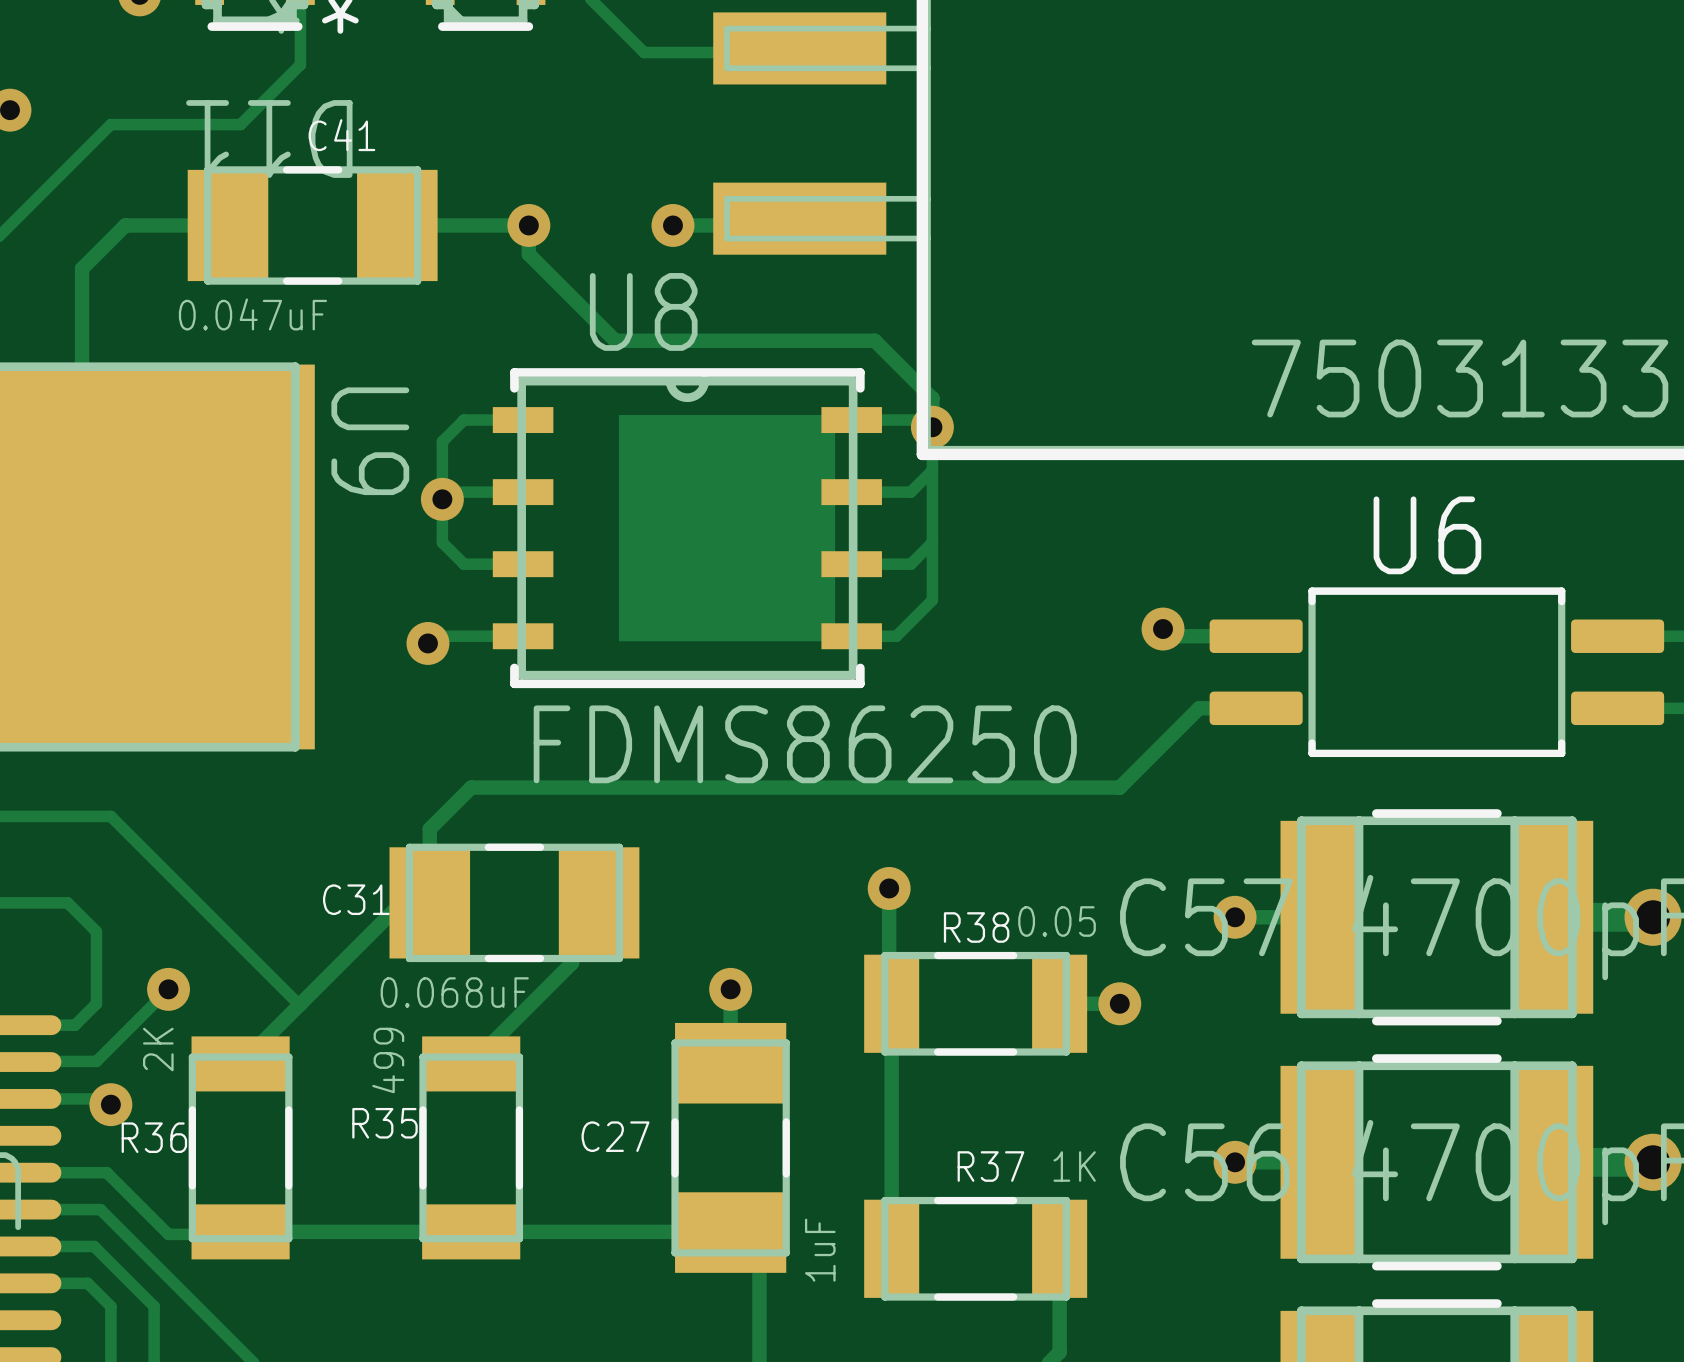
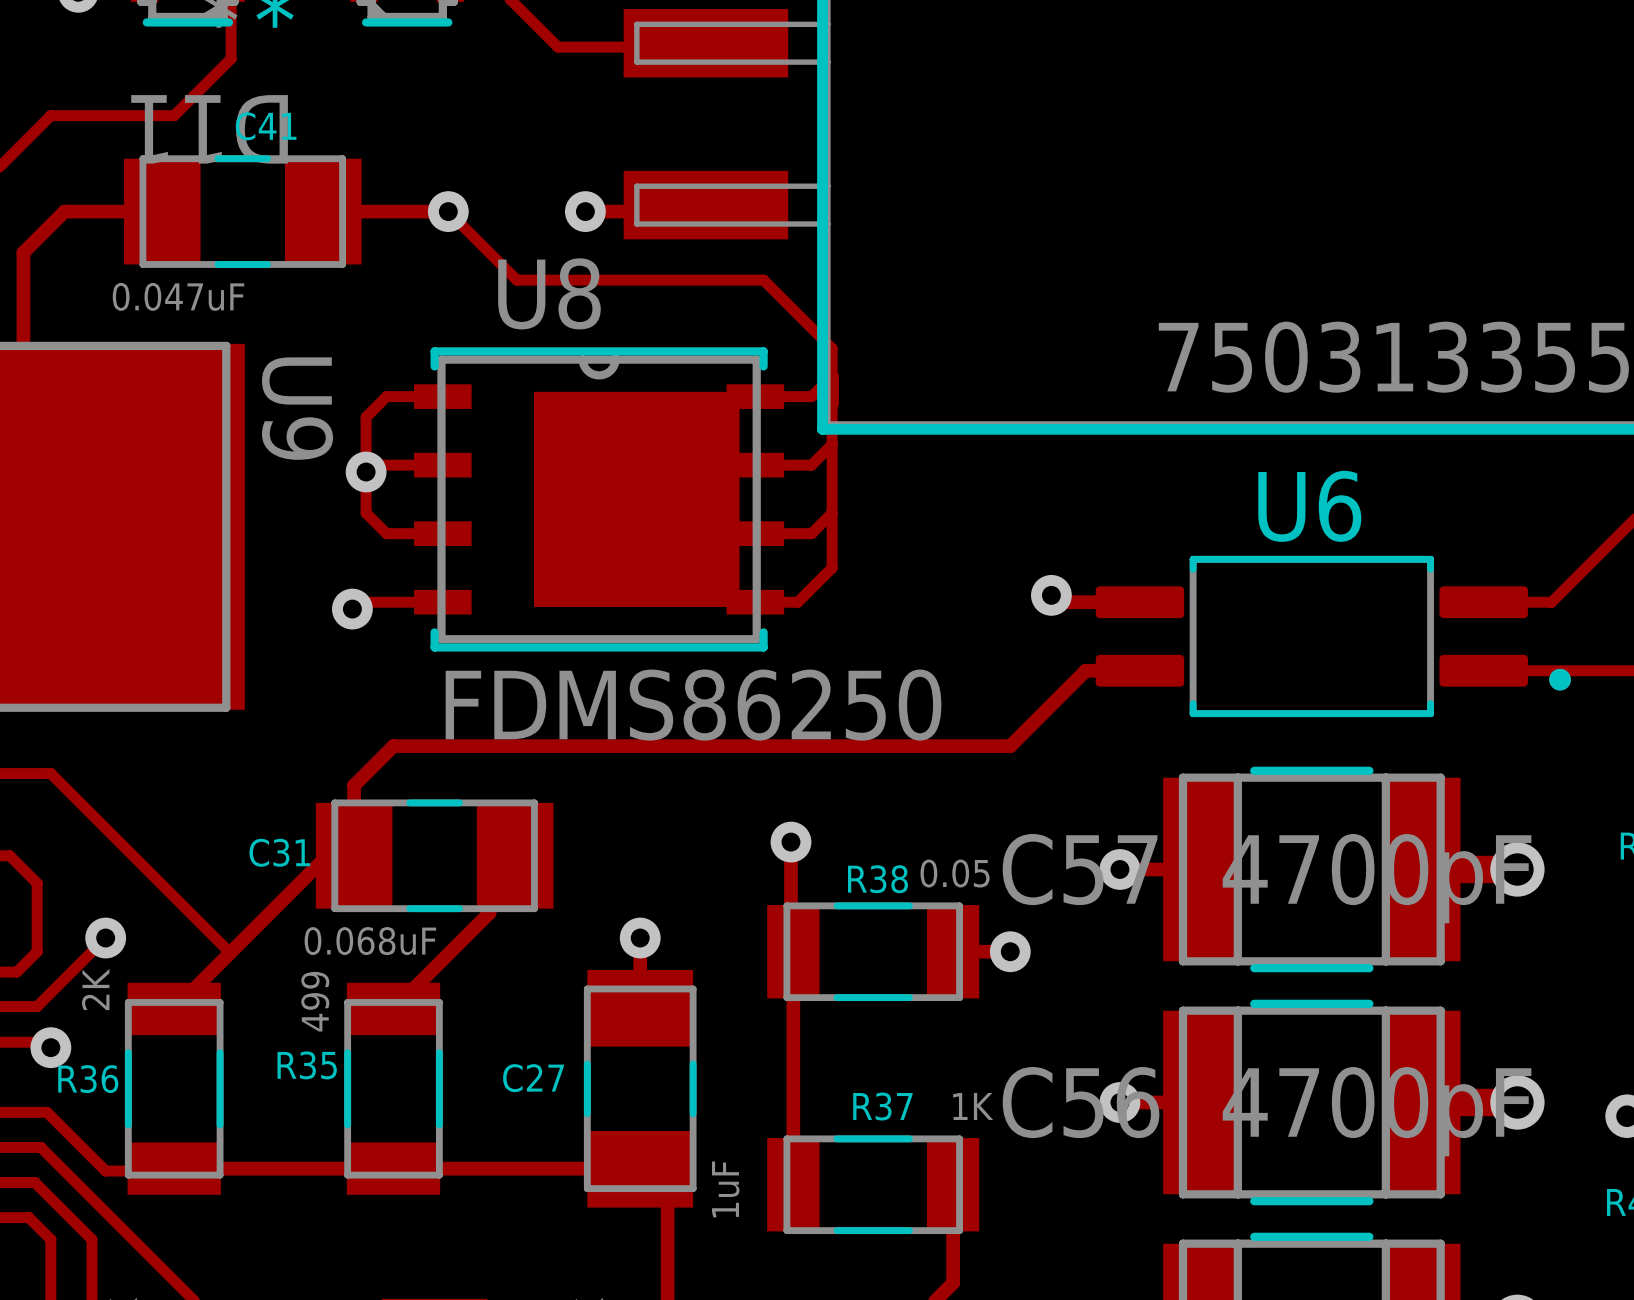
track: (528, 225) (528, 254) (615, 340) (874, 340) (932, 398) -> (448, 211) (516, 280) (763, 280) (832, 348) (832, 376) (811, 396)
via: (932, 427) -> none

